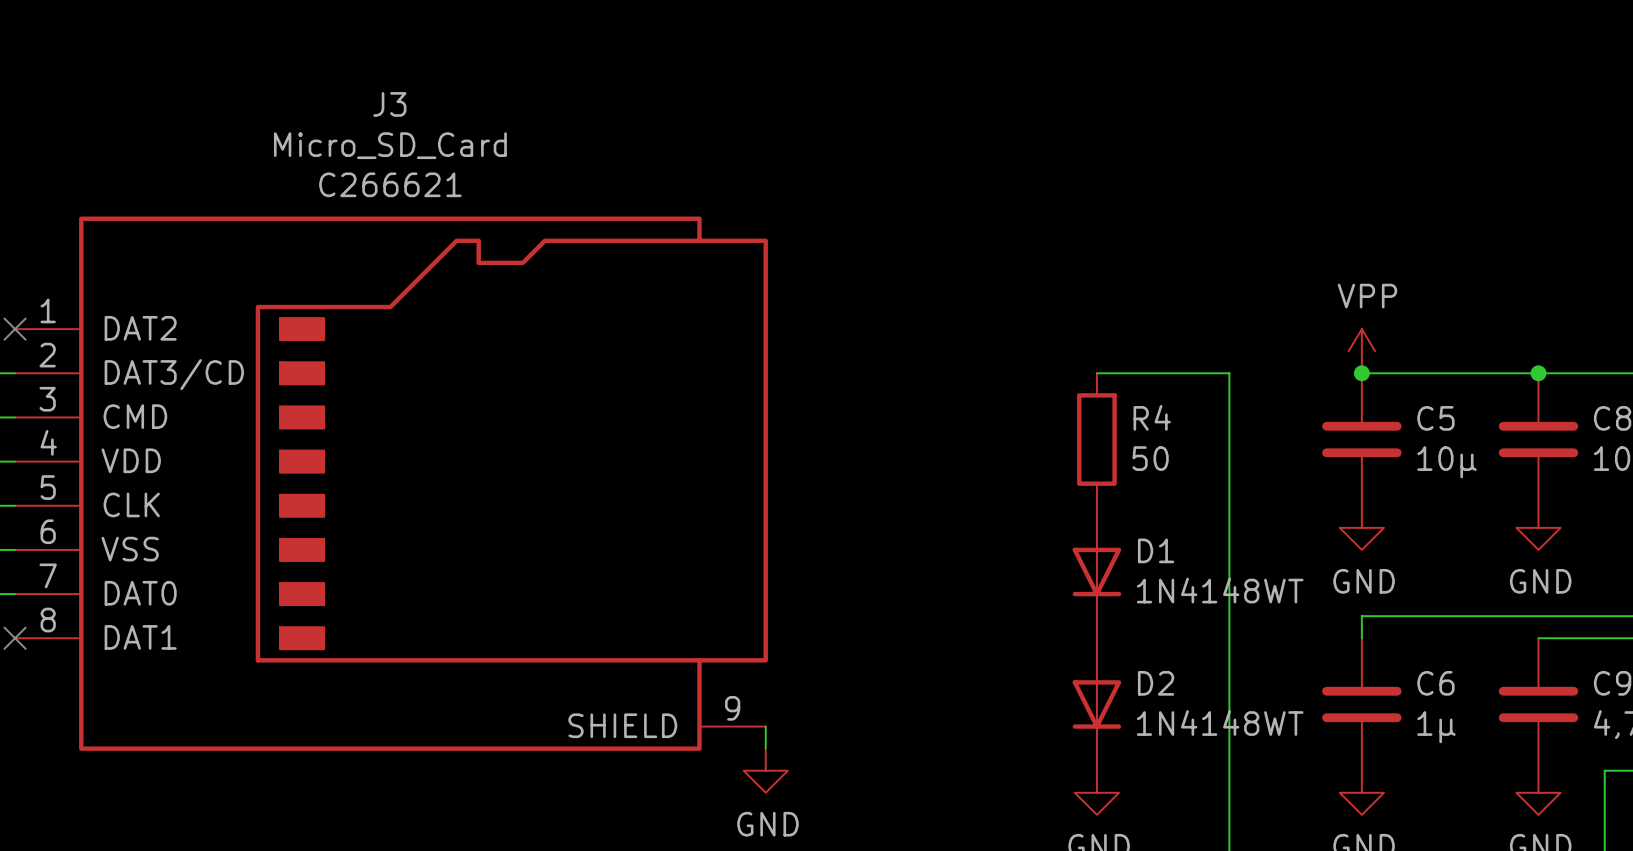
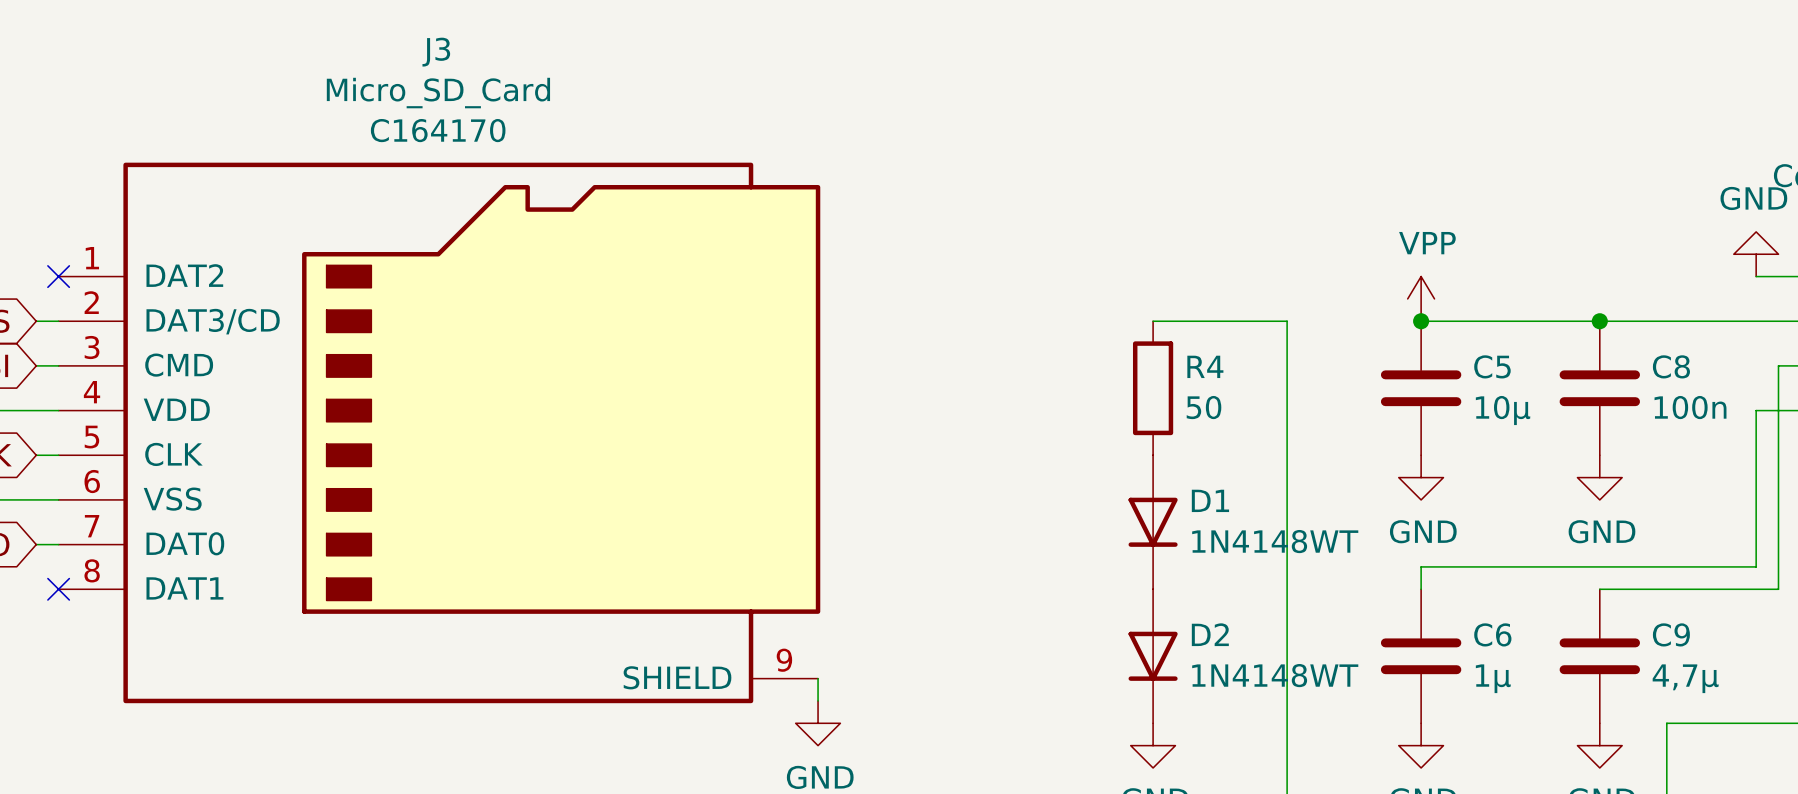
J3 text: C266621 (390, 184) -> C164170 (438, 130)

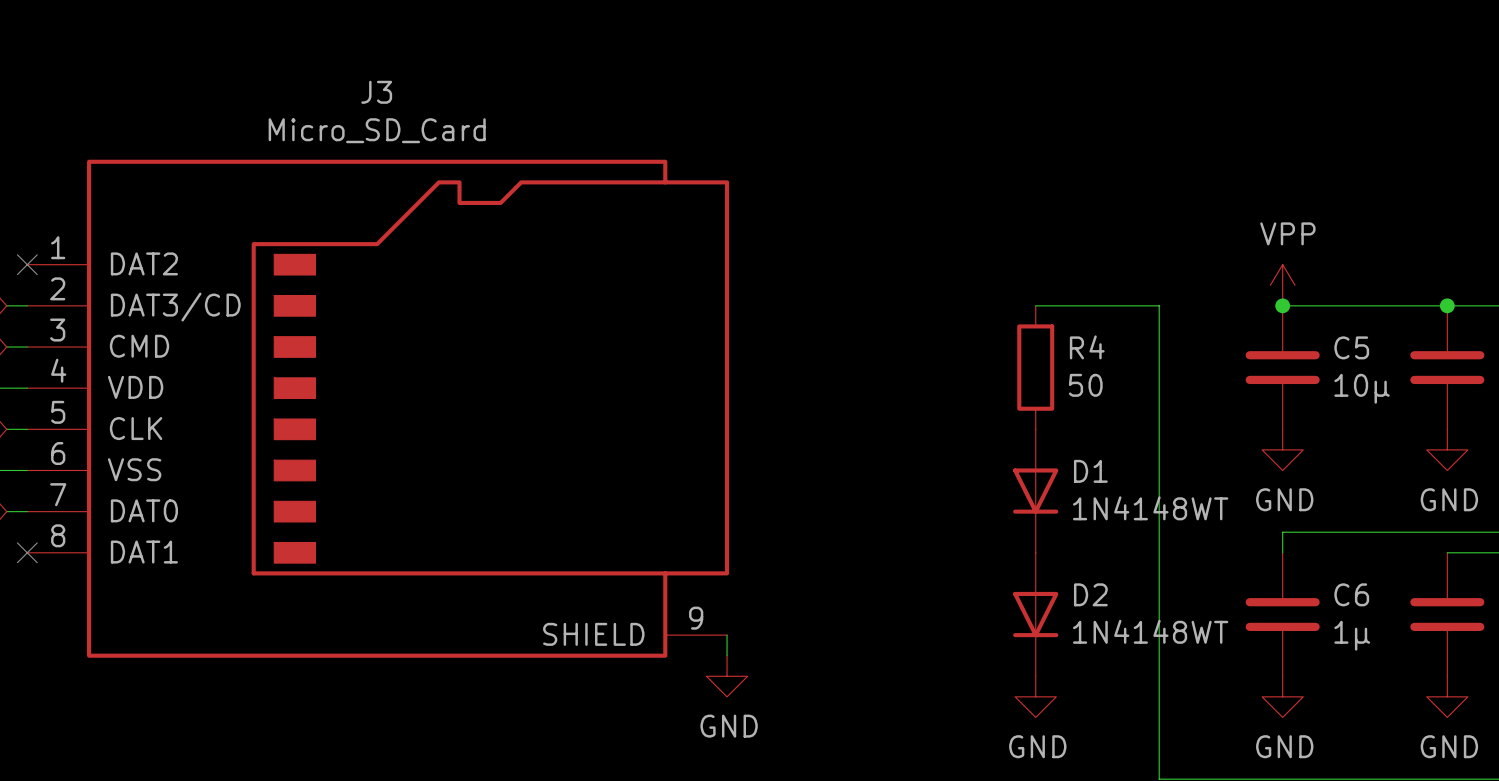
J3 name position: J3 (436, 52) -> J3 (376, 92)
J3 value position: Micro_SD_Card (438, 93) -> Micro_SD_Card (377, 130)
J3 text: C164170 (438, 130) -> none

